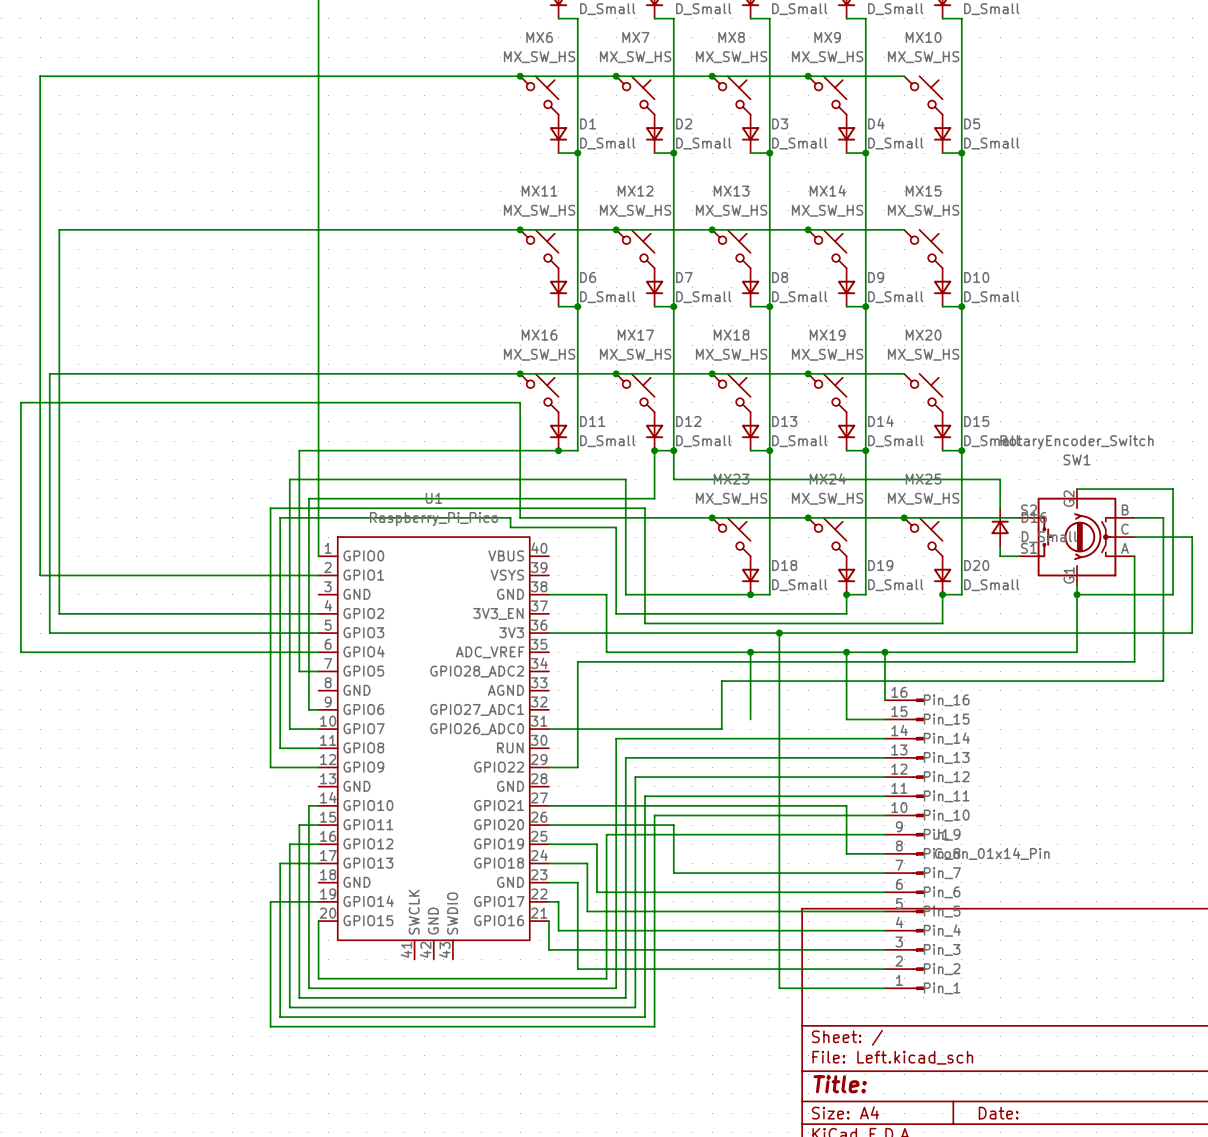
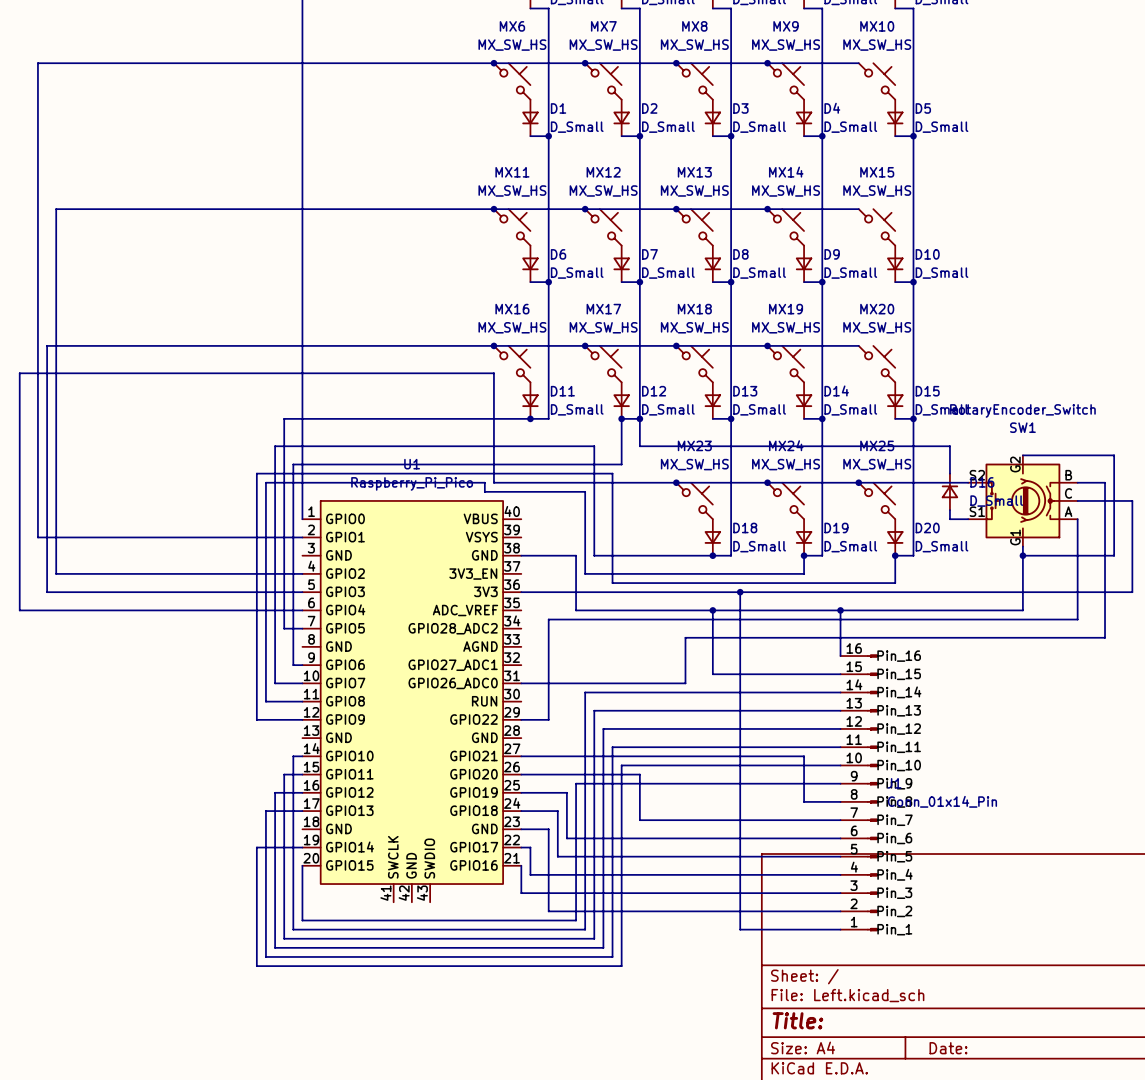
wire: (846, 652) (846, 719) -> (712, 674) (804, 674)
junction: (846, 652) -> none

